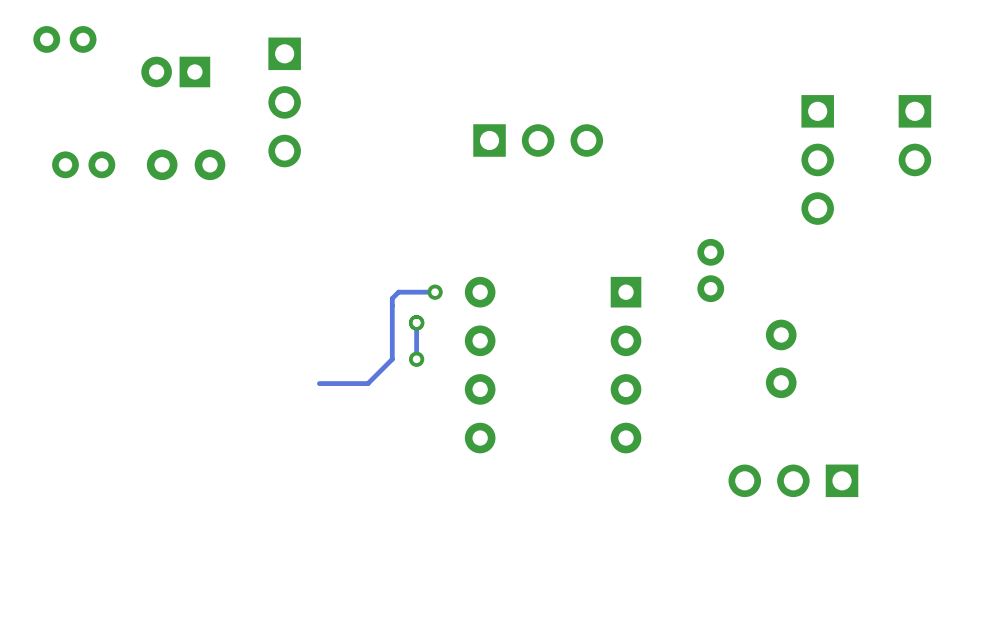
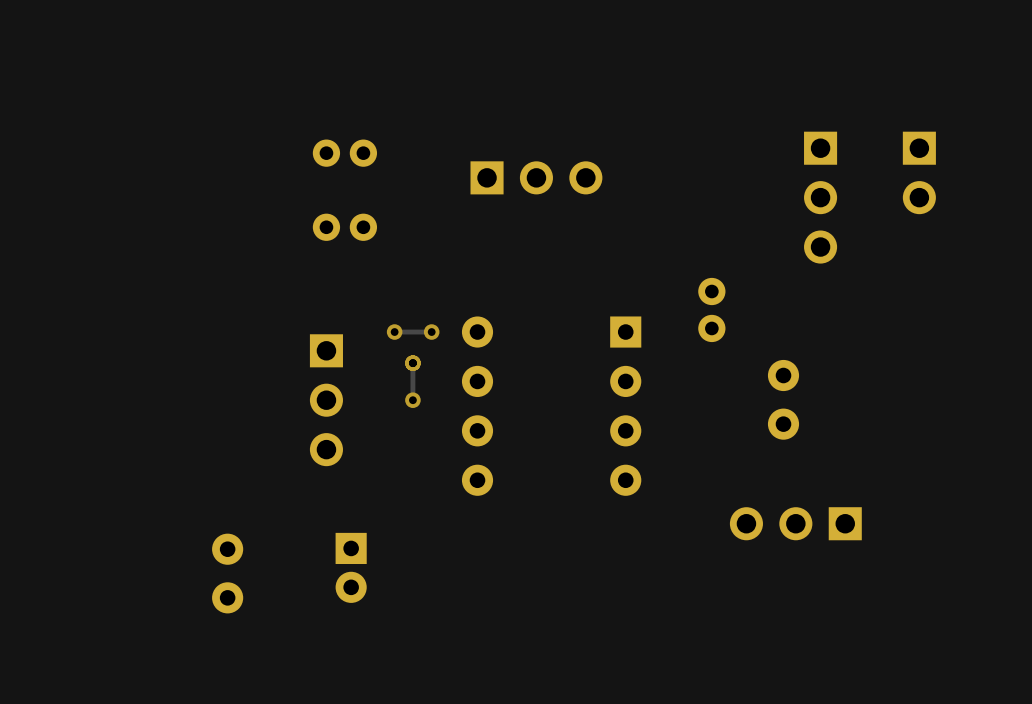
part: (64, 39) -> none
part: (175, 71) -> none
part position: (284, 102) -> (326, 400)
part: none -> (344, 153)
part: (83, 164) -> none
part rotation: 0° (186, 164) -> 90° clockwise (227, 573)
part position: (186, 164) -> (227, 573)
part: none -> (344, 227)
track: (398, 292) (392, 298) (392, 359) (367, 383) (319, 383) -> none
via: none -> (394, 332)
part: none -> (351, 567)

